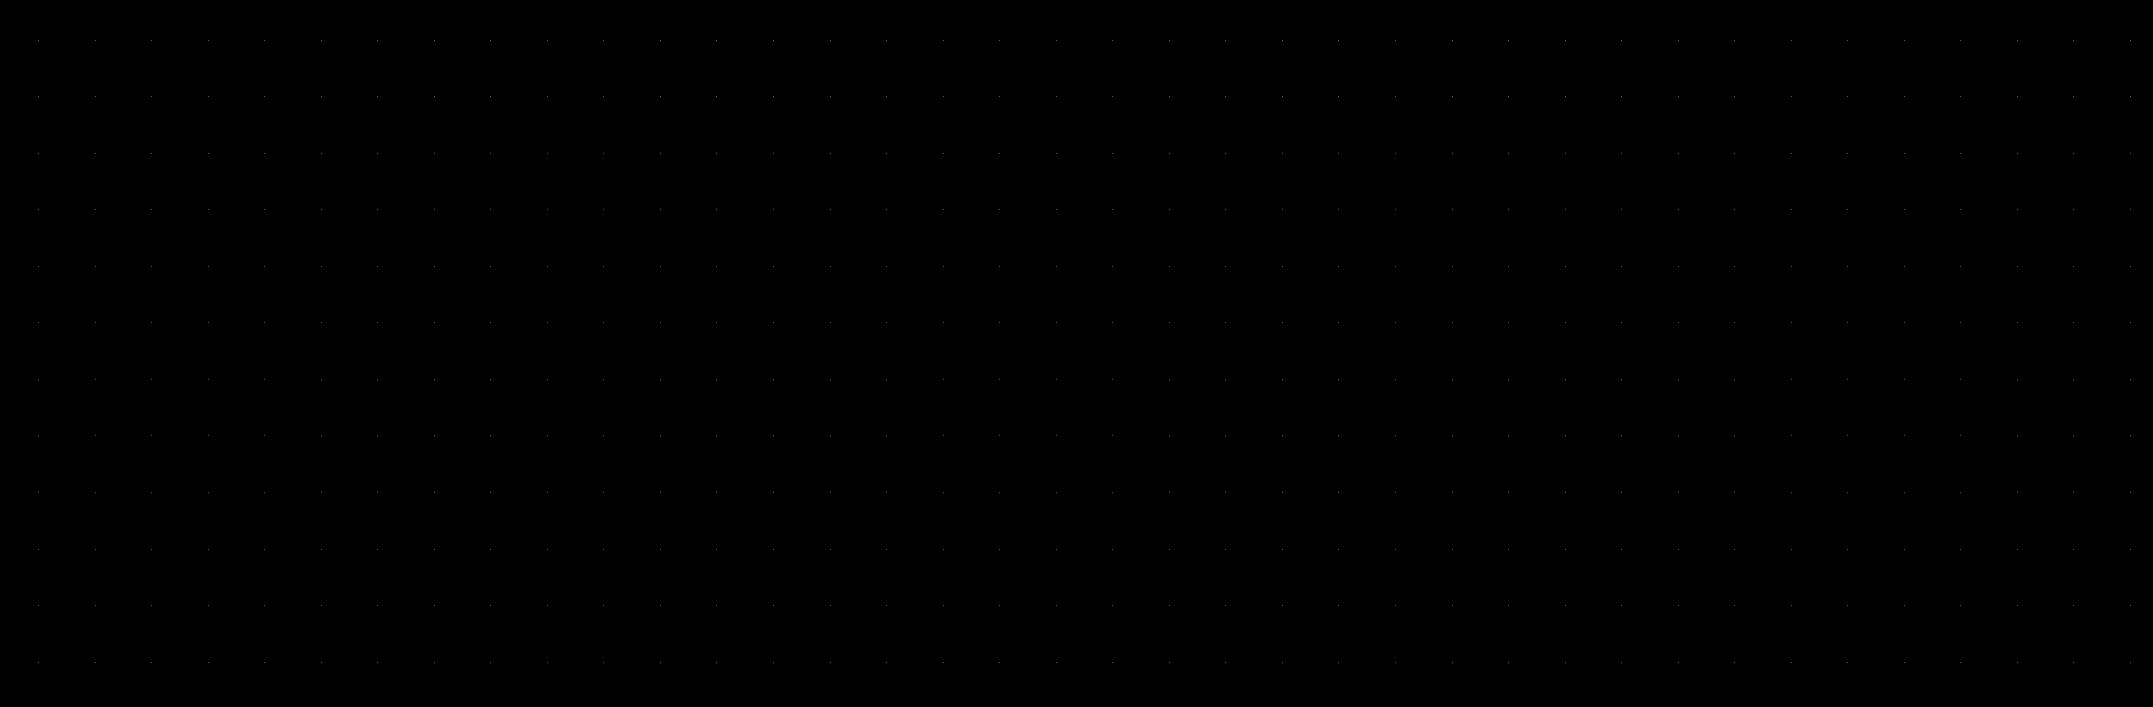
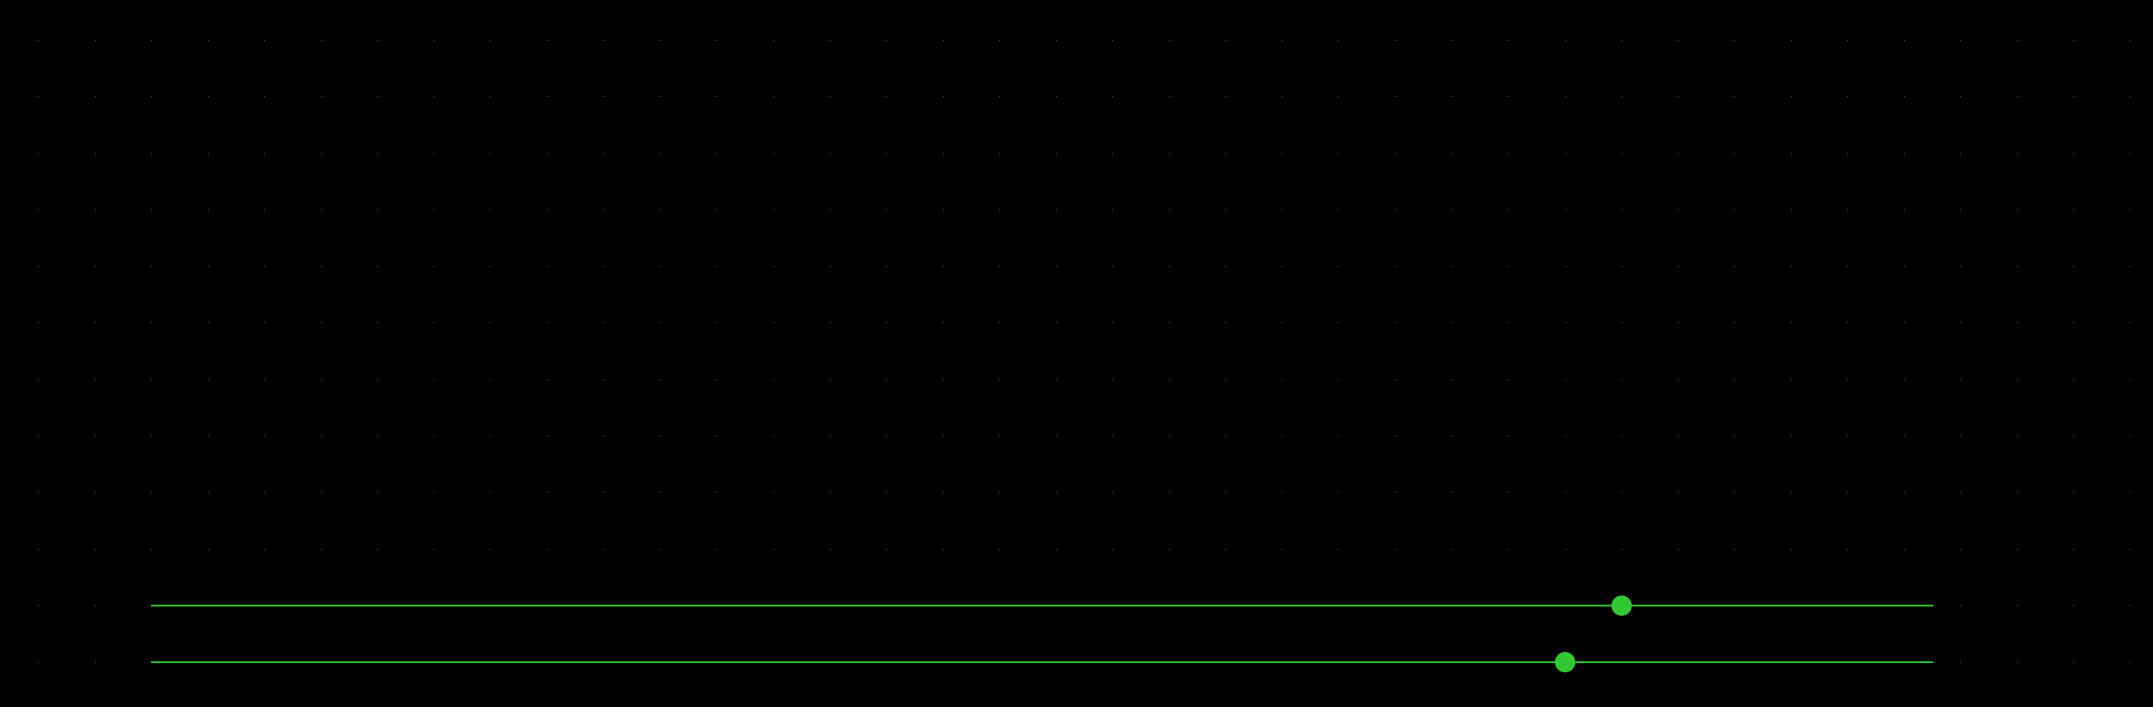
wire: none -> (151, 605) (1932, 605)
junction: none -> (1621, 605)
wire: none -> (151, 662) (1932, 662)
junction: none -> (1565, 662)

